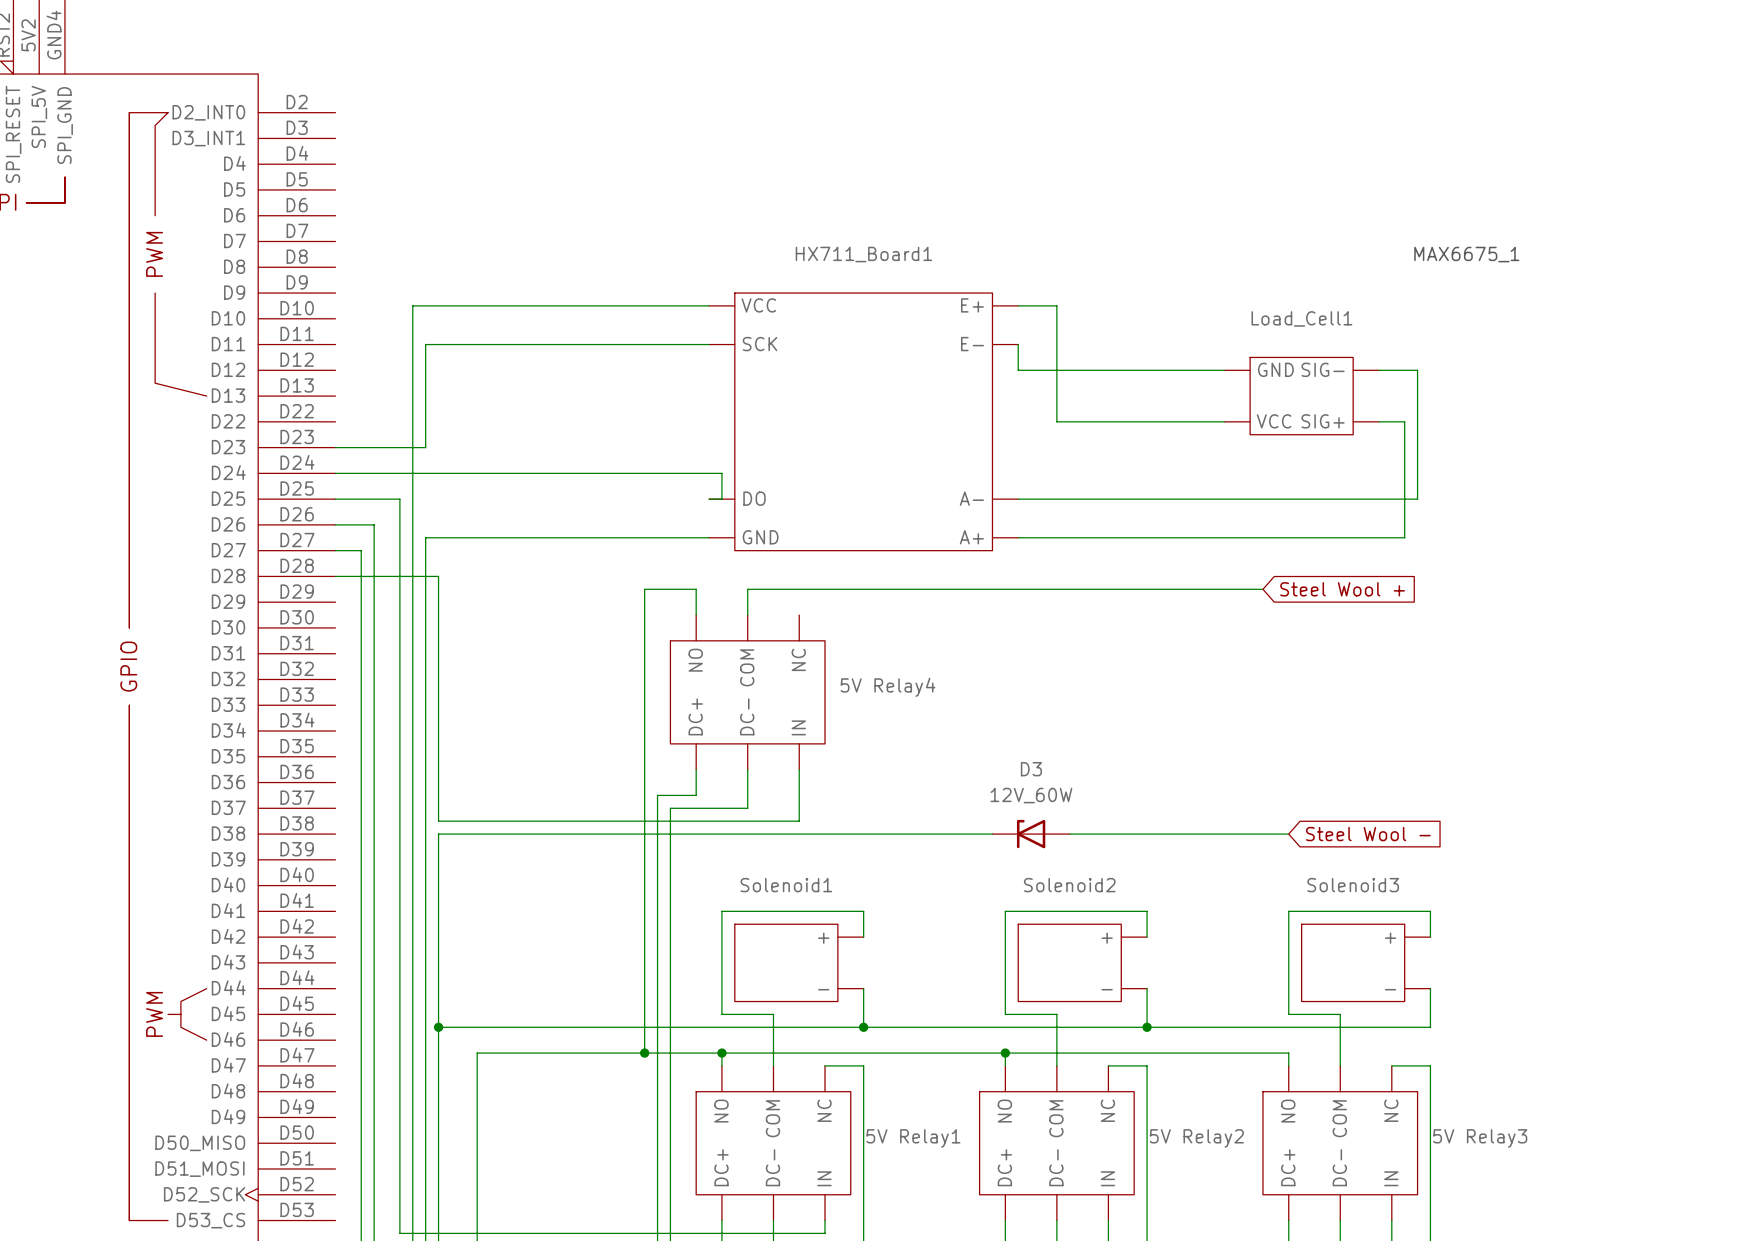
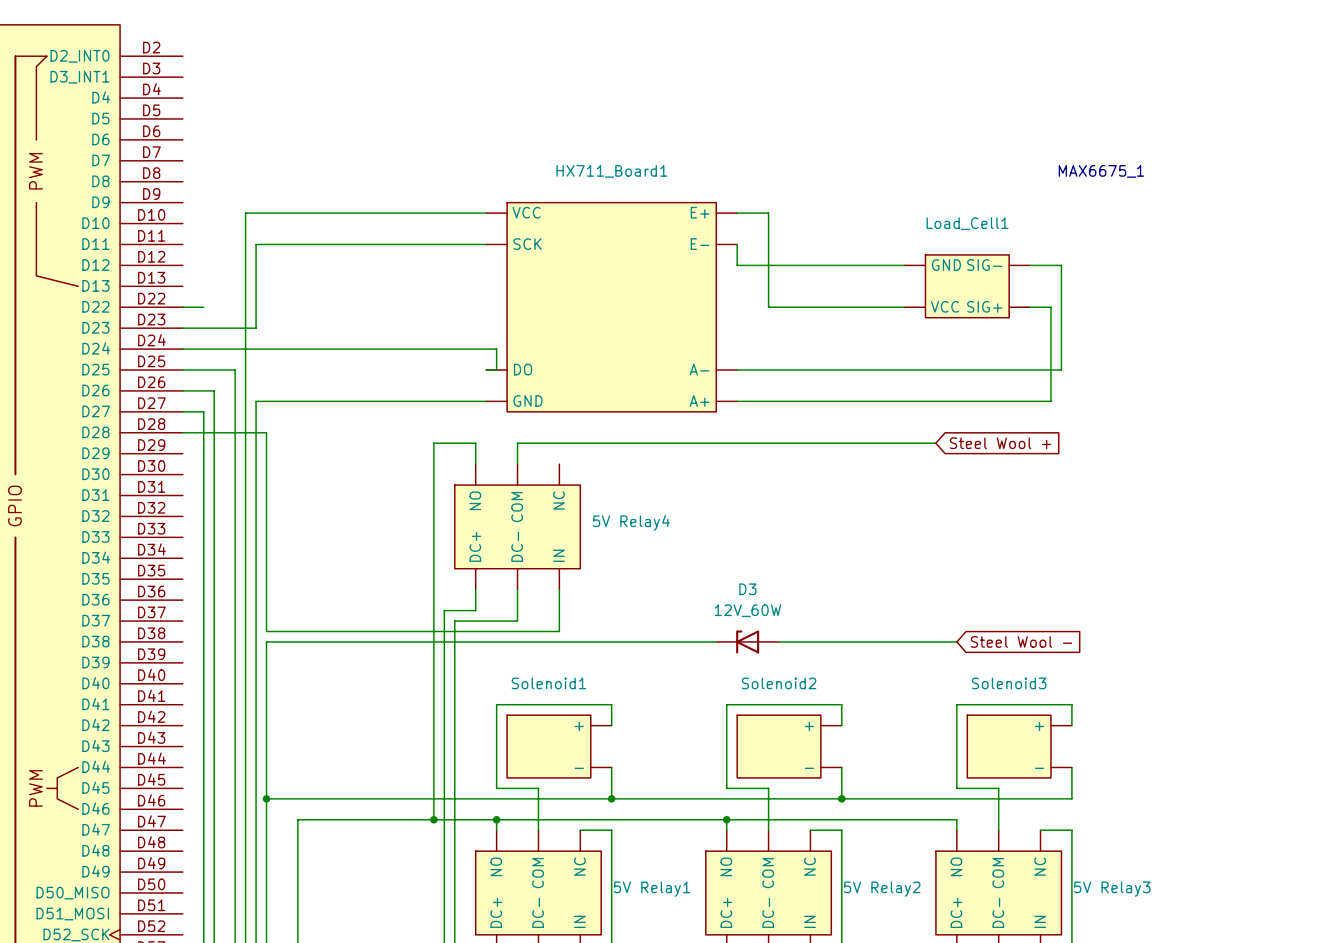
wire: none -> (182, 307) (203, 307)

